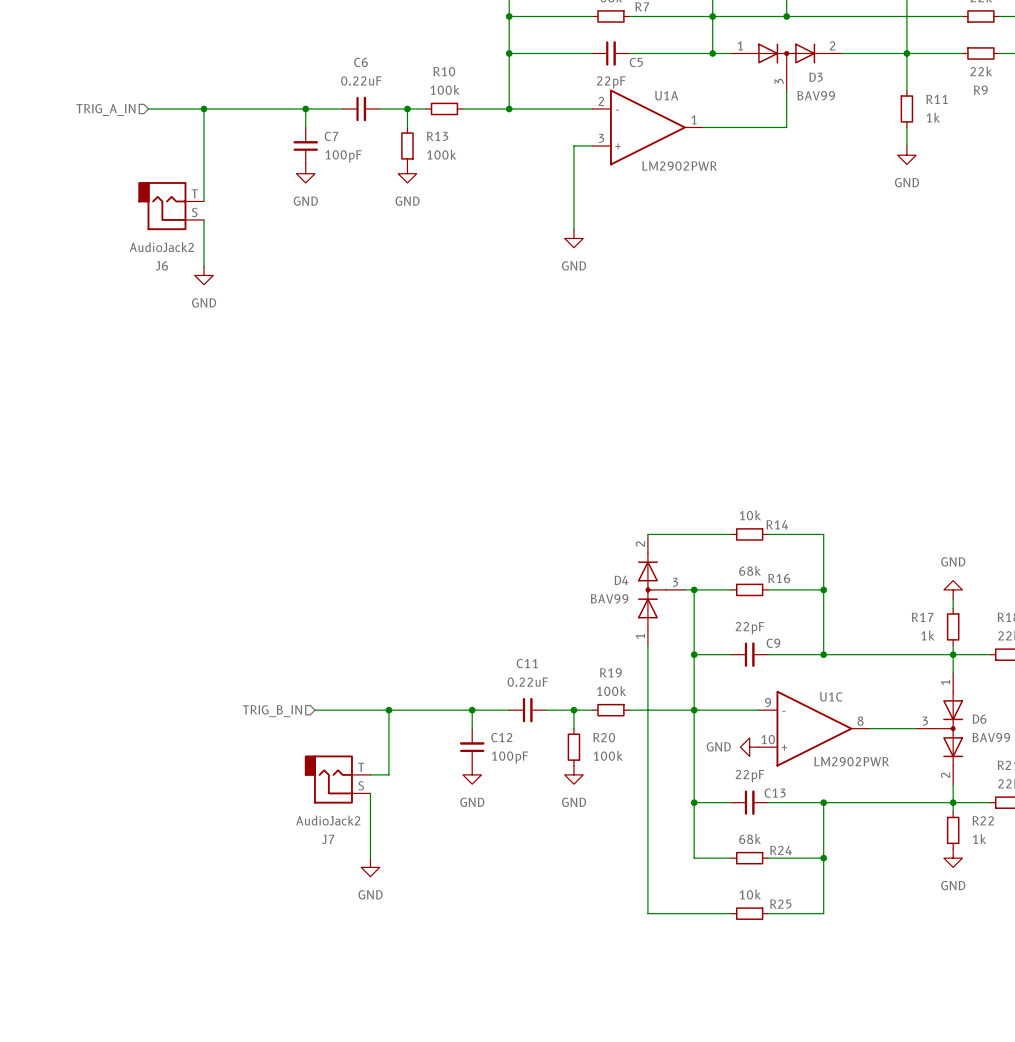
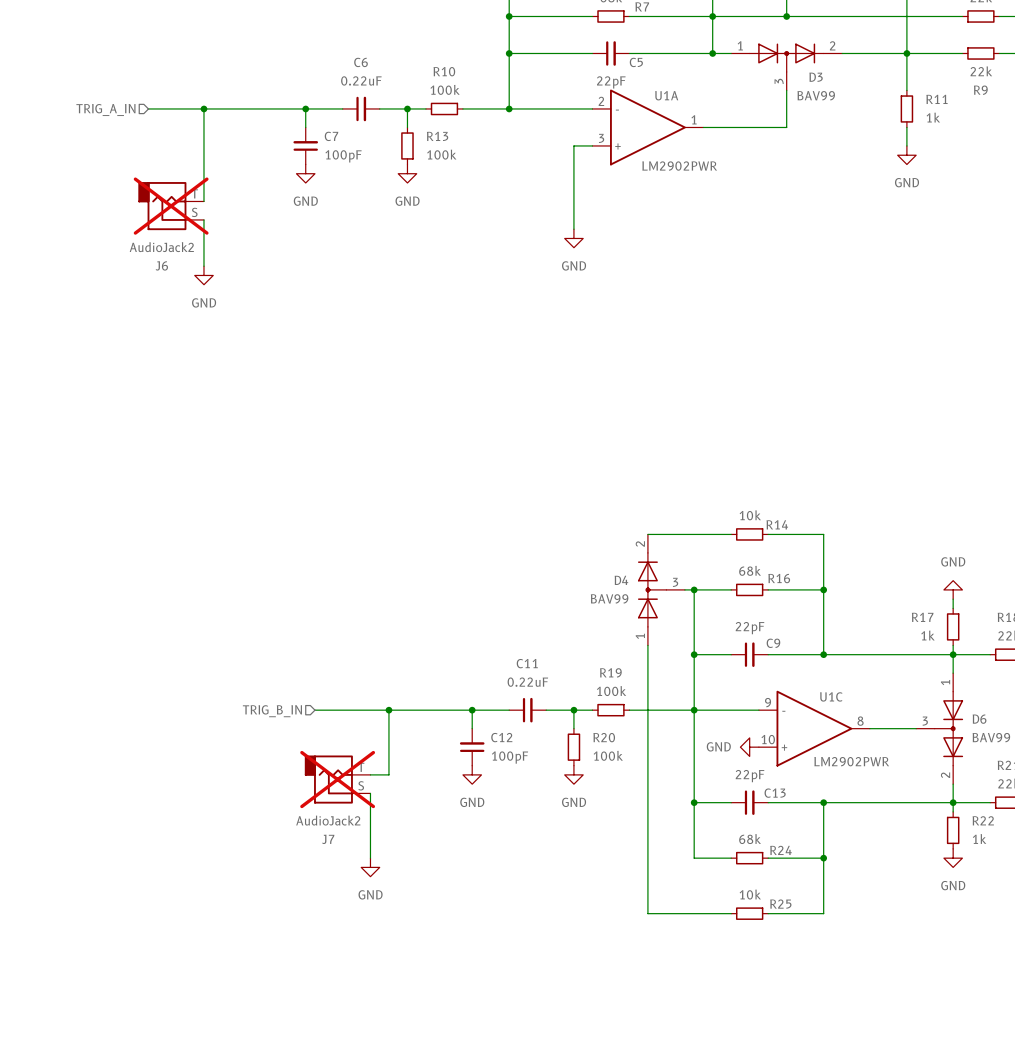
J6 do-not-place cross: none -> (171, 206)
J7 do-not-place cross: none -> (337, 779)

